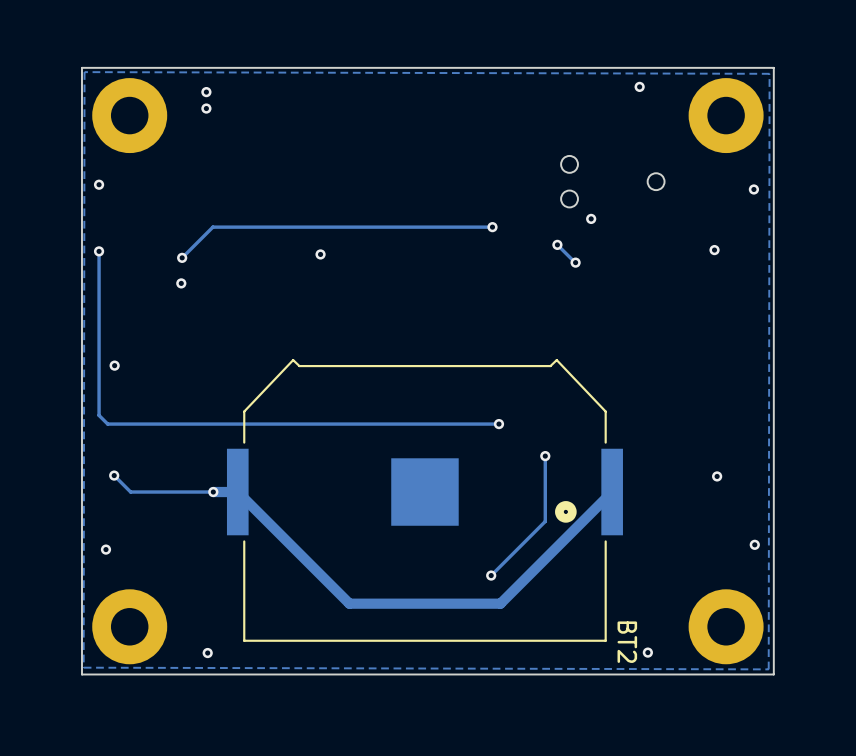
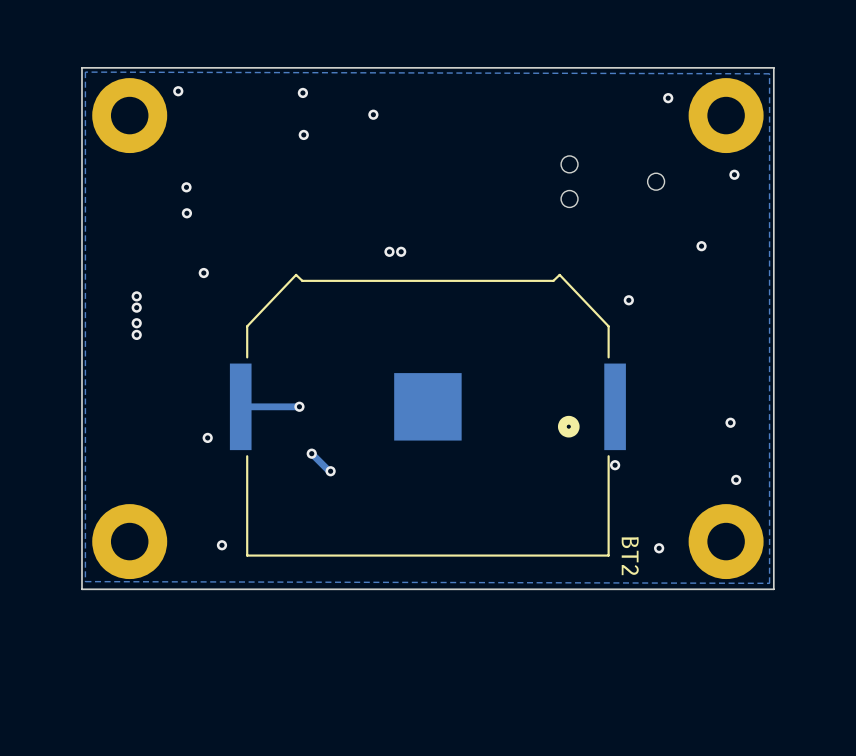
zone outline: (85, 72) (83, 667) (768, 669) (769, 73) -> (85, 72) (85, 581) (769, 583) (769, 73)
via position: (639, 86) -> (668, 98)
via: none -> (178, 91)
via: (206, 92) -> none
via: none -> (302, 92)
via: (206, 108) -> none
via: none -> (373, 114)
via: none -> (303, 134)
via: (99, 184) -> none
via: none -> (186, 187)
via position: (753, 189) -> (734, 174)
via: none -> (186, 213)
via: (591, 218) -> none
track: (492, 227) (212, 227) (182, 257) -> none
via: (492, 227) -> none
track: (557, 244) (575, 262) -> none
via: (557, 244) -> none
via position: (714, 250) -> (701, 246)
track: (99, 251) (99, 415) (107, 424) (498, 424) -> none
via: (99, 251) -> none
via: none -> (389, 251)
via: none -> (401, 251)
via: (320, 254) -> none
via: (182, 257) -> none
via: (575, 262) -> none
via: none -> (203, 273)
via: (181, 283) -> none
via: none -> (136, 296)
via: none -> (628, 300)
via: none -> (136, 307)
via: none -> (136, 323)
via: none -> (136, 334)
via: (114, 365) -> none
track: none -> (299, 406) (240, 406)
via: none -> (299, 406)
via: none -> (730, 422)
via: (498, 424) -> none
via: none -> (207, 437)
track: none -> (311, 453) (330, 471)
via: none -> (311, 453)
track: (545, 456) (545, 521) (491, 575) -> none
via: (545, 456) -> none
via: none -> (615, 465)
via: none -> (330, 471)
track: (114, 475) (130, 492) (237, 492) (349, 603) (500, 603) (612, 492) -> none
via: (114, 475) -> none
via position: (717, 476) -> (736, 479)
via: (213, 492) -> none
BT2 position: (424, 500) -> (427, 415)
part position: (565, 511) -> (568, 426)
via: (754, 544) -> none
via: none -> (221, 545)
via: none -> (659, 548)
via: (105, 549) -> none
via: (491, 575) -> none
board edge: (773, 589) (773, 674) (81, 674) (81, 589) -> (773, 589) (81, 589)
part position: (129, 626) -> (129, 541)
part position: (726, 626) -> (726, 541)
via: (647, 652) -> none
via: (207, 653) -> none

